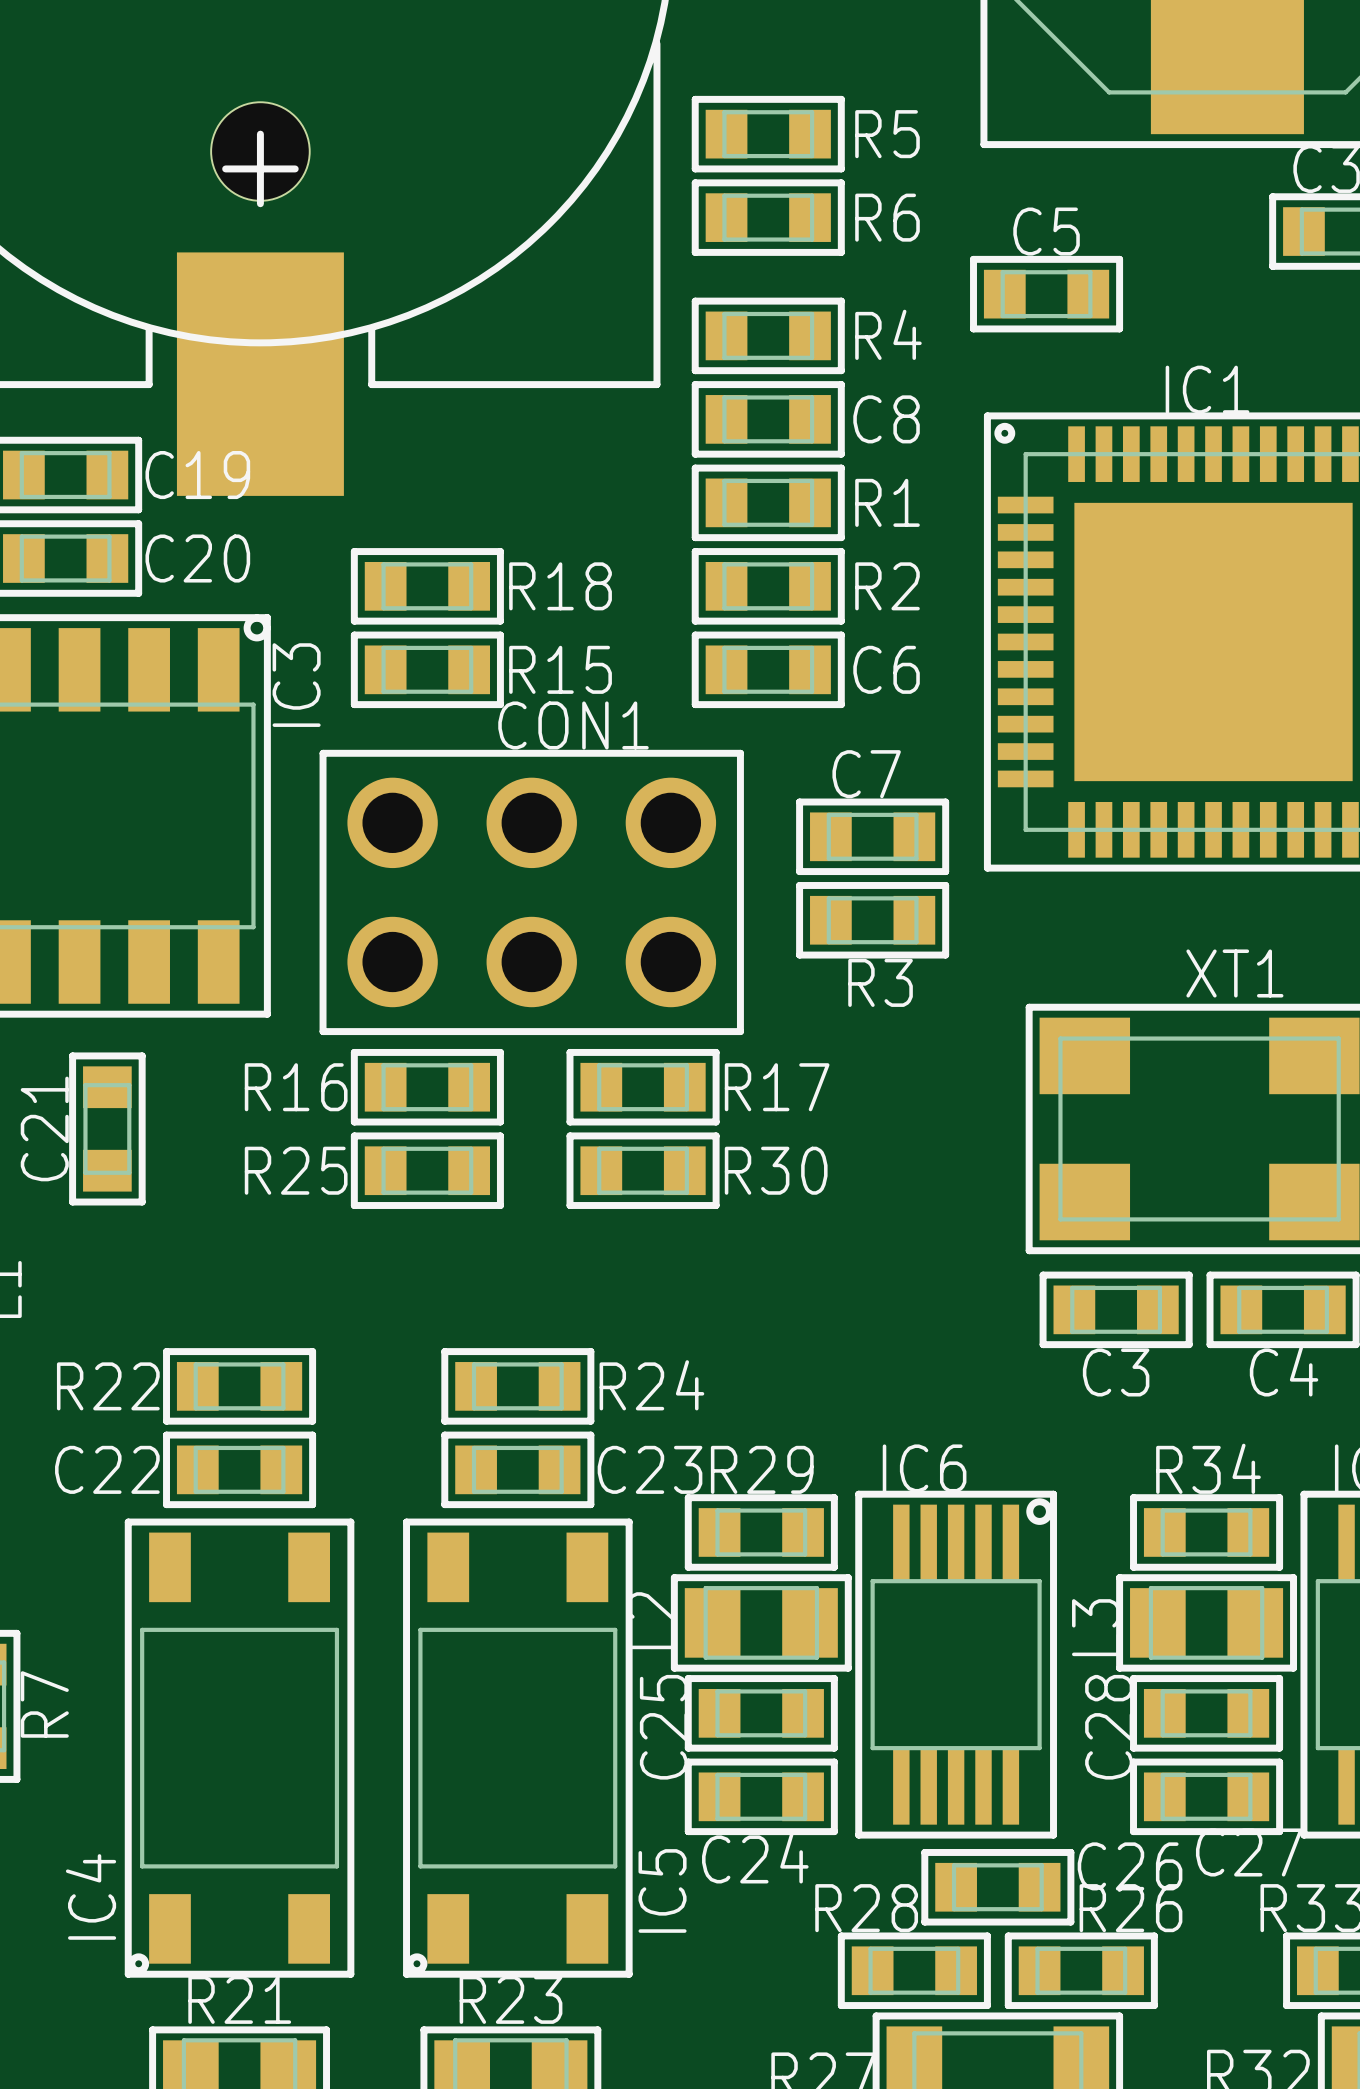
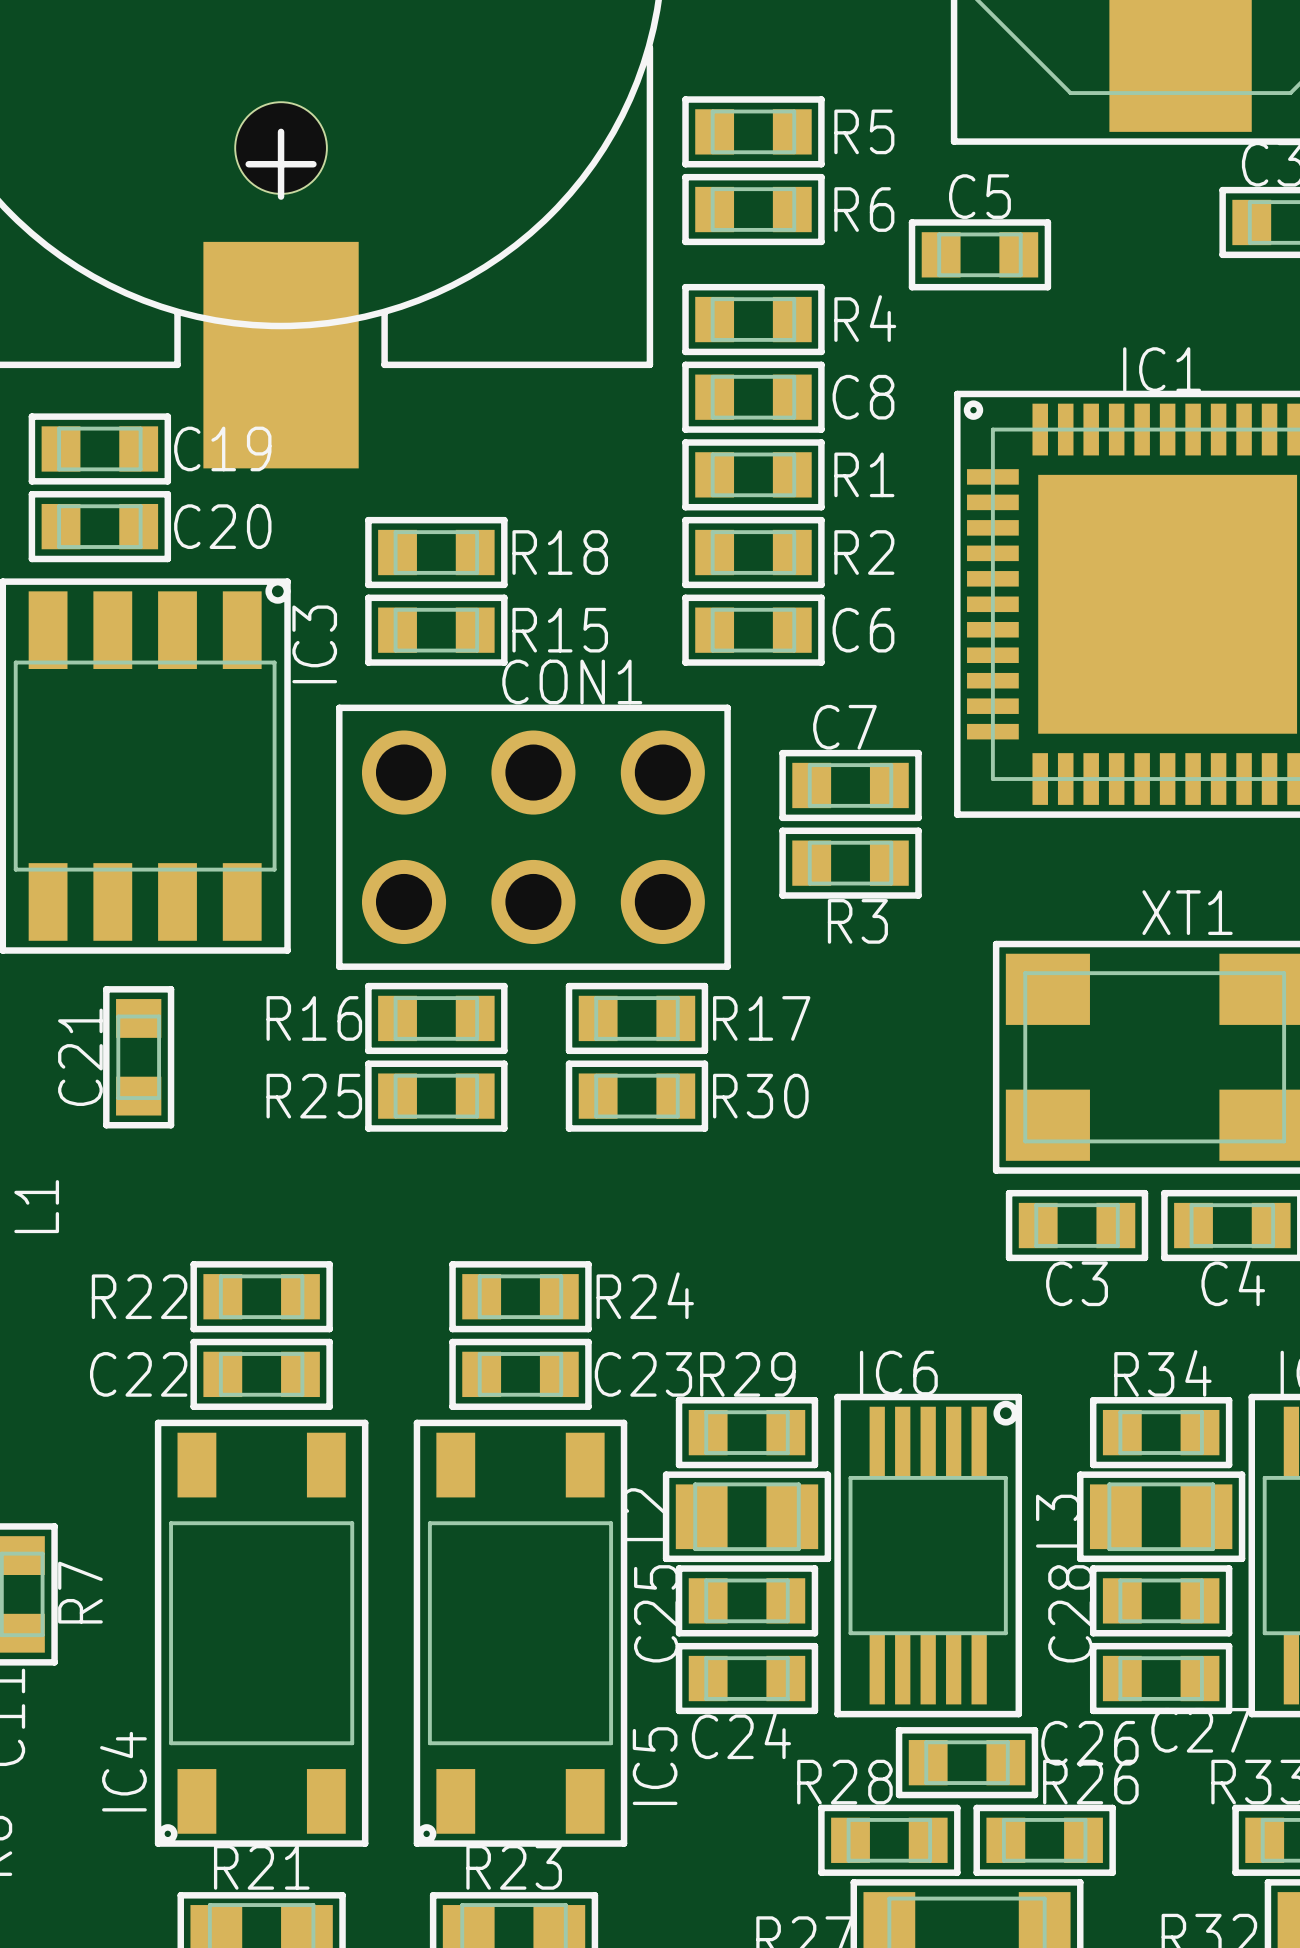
C5 position: (1046, 294) -> (979, 254)

